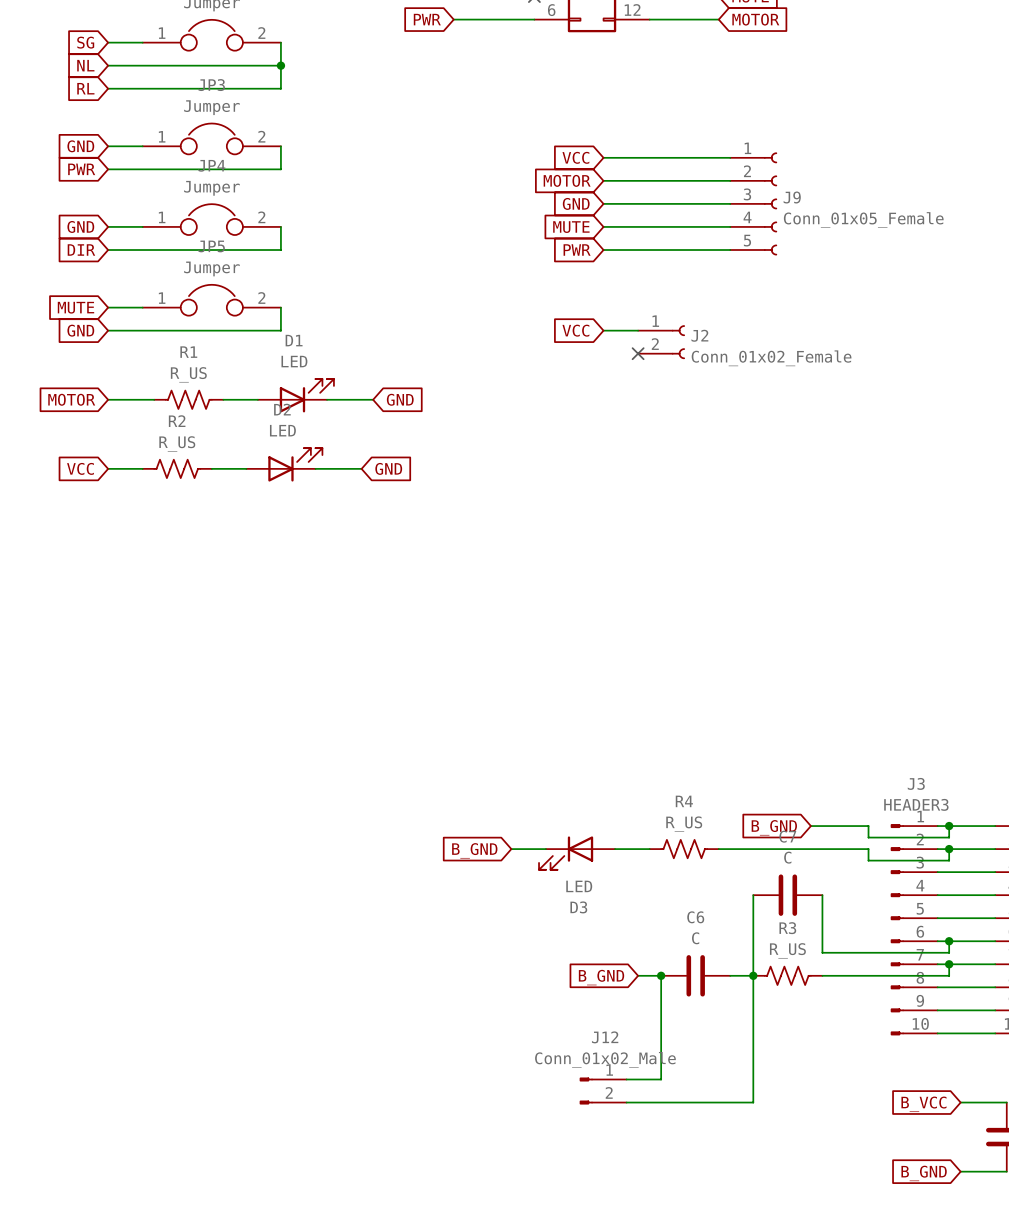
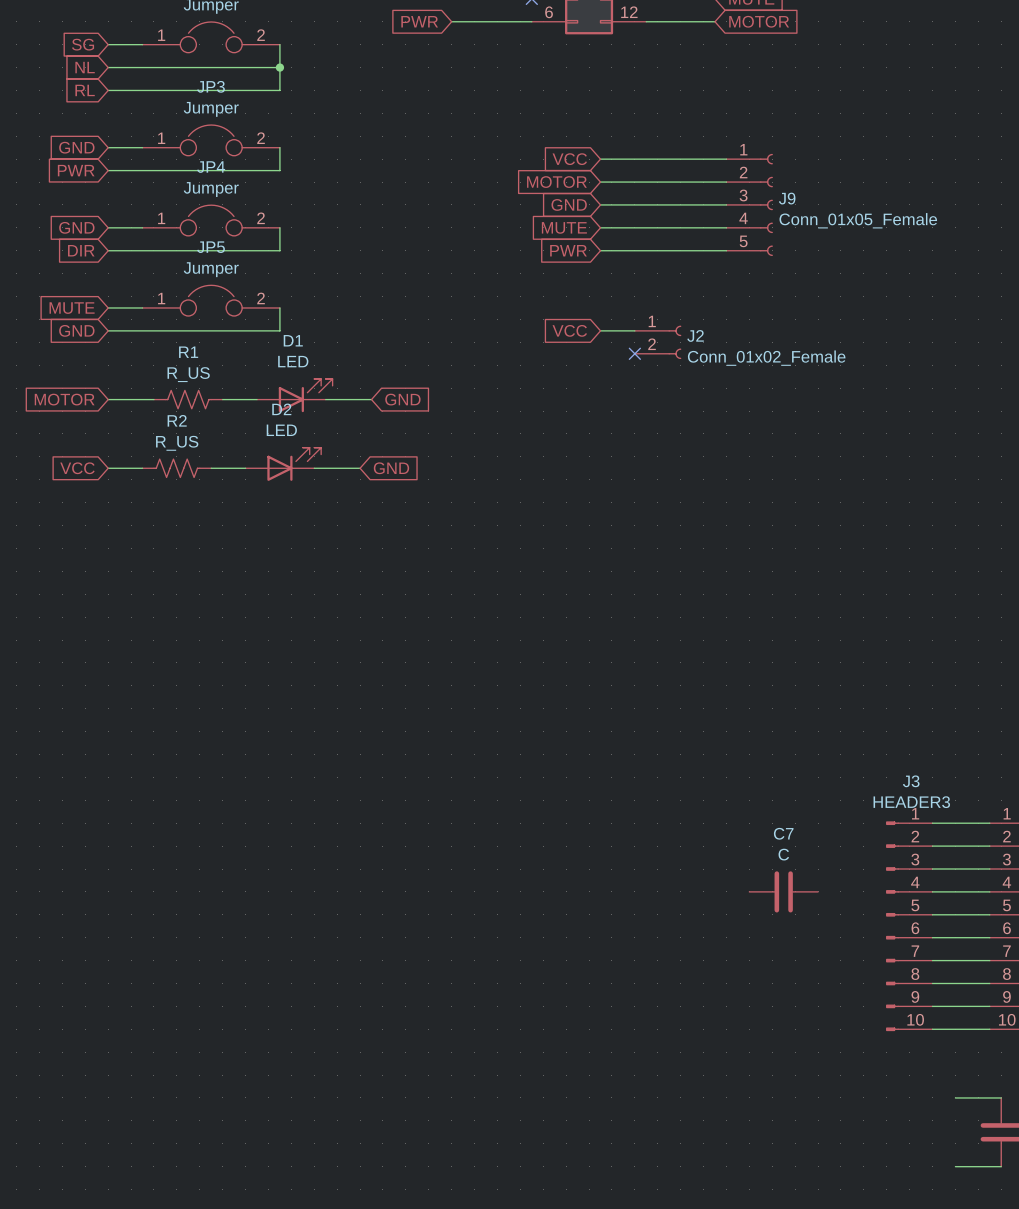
wire: (810, 826) (868, 826) (868, 837) (949, 837) (949, 826) -> none
junction: (949, 826) -> none
global label: B_GND (774, 827) -> none
wire: (511, 849) (545, 849) -> none
wire: (615, 849) (649, 849) -> none
R4: R_US (684, 849) -> none
wire: (718, 849) (868, 849) (868, 860) (949, 860) (949, 849) -> none
junction: (949, 849) -> none
global label: B_GND (474, 850) -> none
D3: LED (577, 853) -> none
wire: (753, 895) (753, 1102) (626, 1102) -> none
wire: (822, 895) (822, 952) (949, 952) (949, 941) -> none
junction: (949, 941) -> none
wire: (949, 964) (949, 975) (822, 975) -> none
junction: (949, 964) -> none
wire: (638, 975) (661, 975) (661, 1079) (626, 1079) -> none
junction: (661, 975) -> none
C6: C (695, 975) -> none
wire: (730, 975) (753, 975) -> none
junction: (753, 975) -> none
R3: R_US (787, 975) -> none
global label: B_GND (601, 977) -> none
J12: Conn_01x02_Male (603, 1091) -> none
global label: B_VCC (923, 1104) -> none
global label: B_GND (924, 1173) -> none

